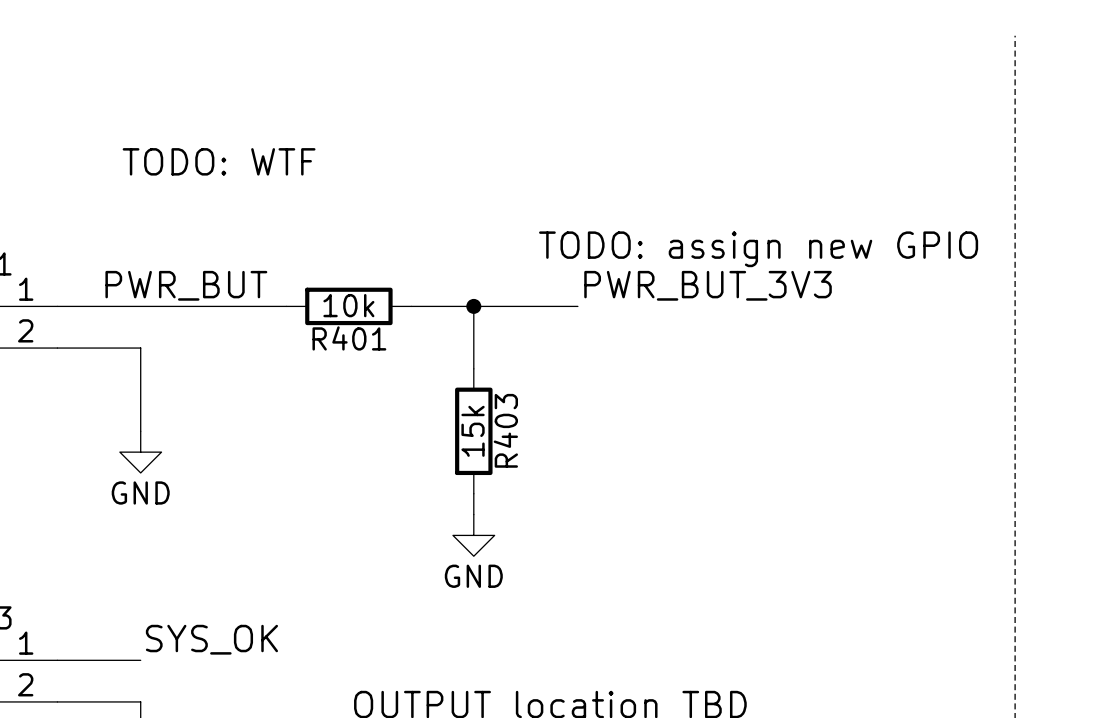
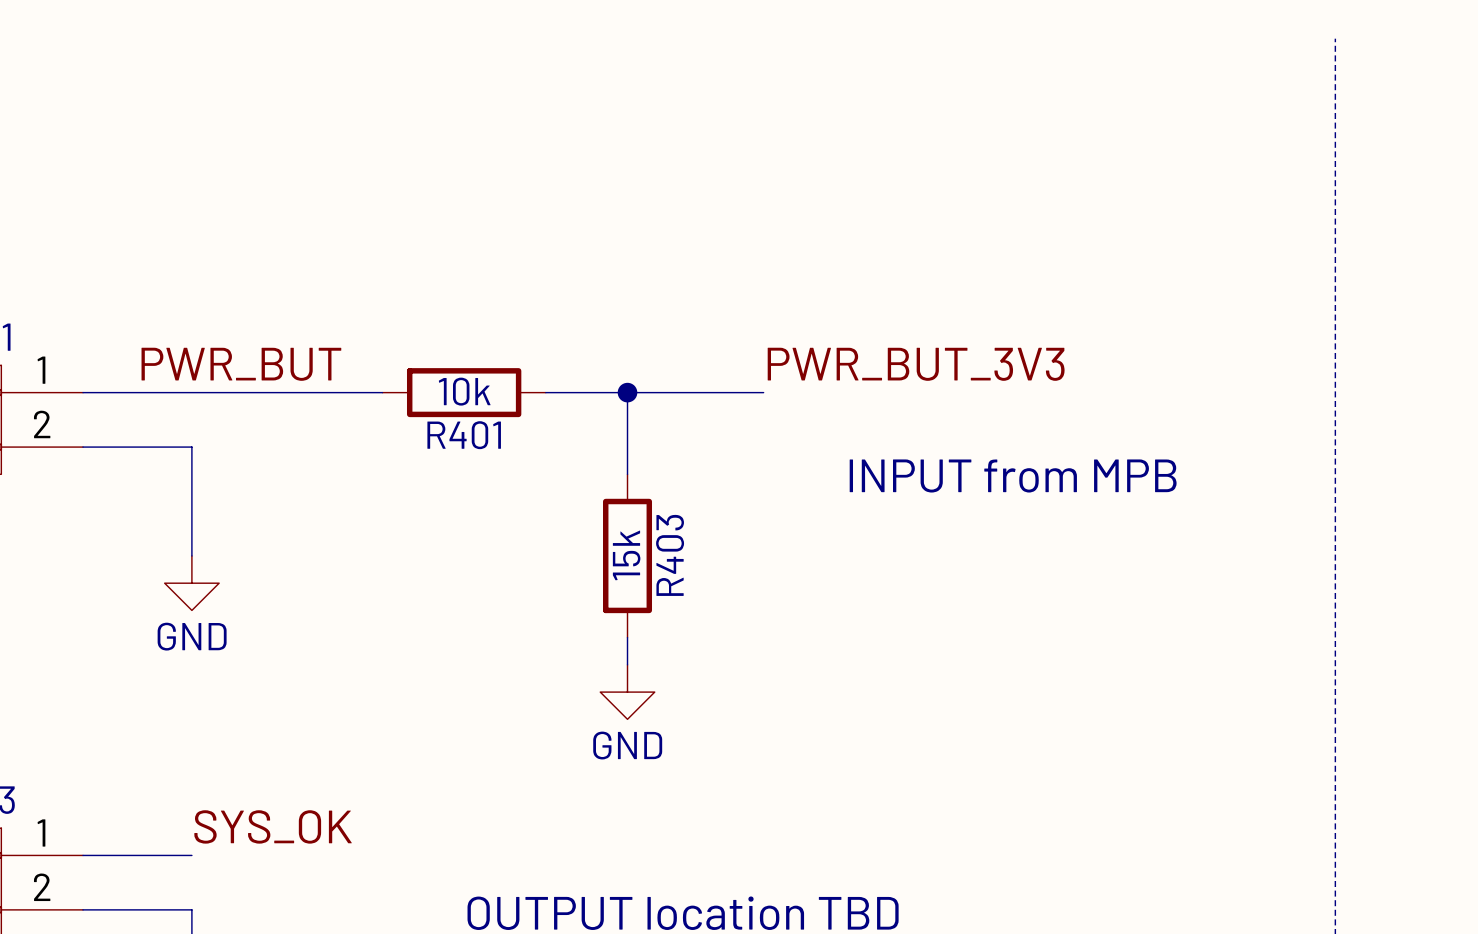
text: TODO: WTF (219, 161) -> none
text: TODO: assign new GPIO (758, 249) -> none
text: none -> INPUT from MPB (1013, 475)

